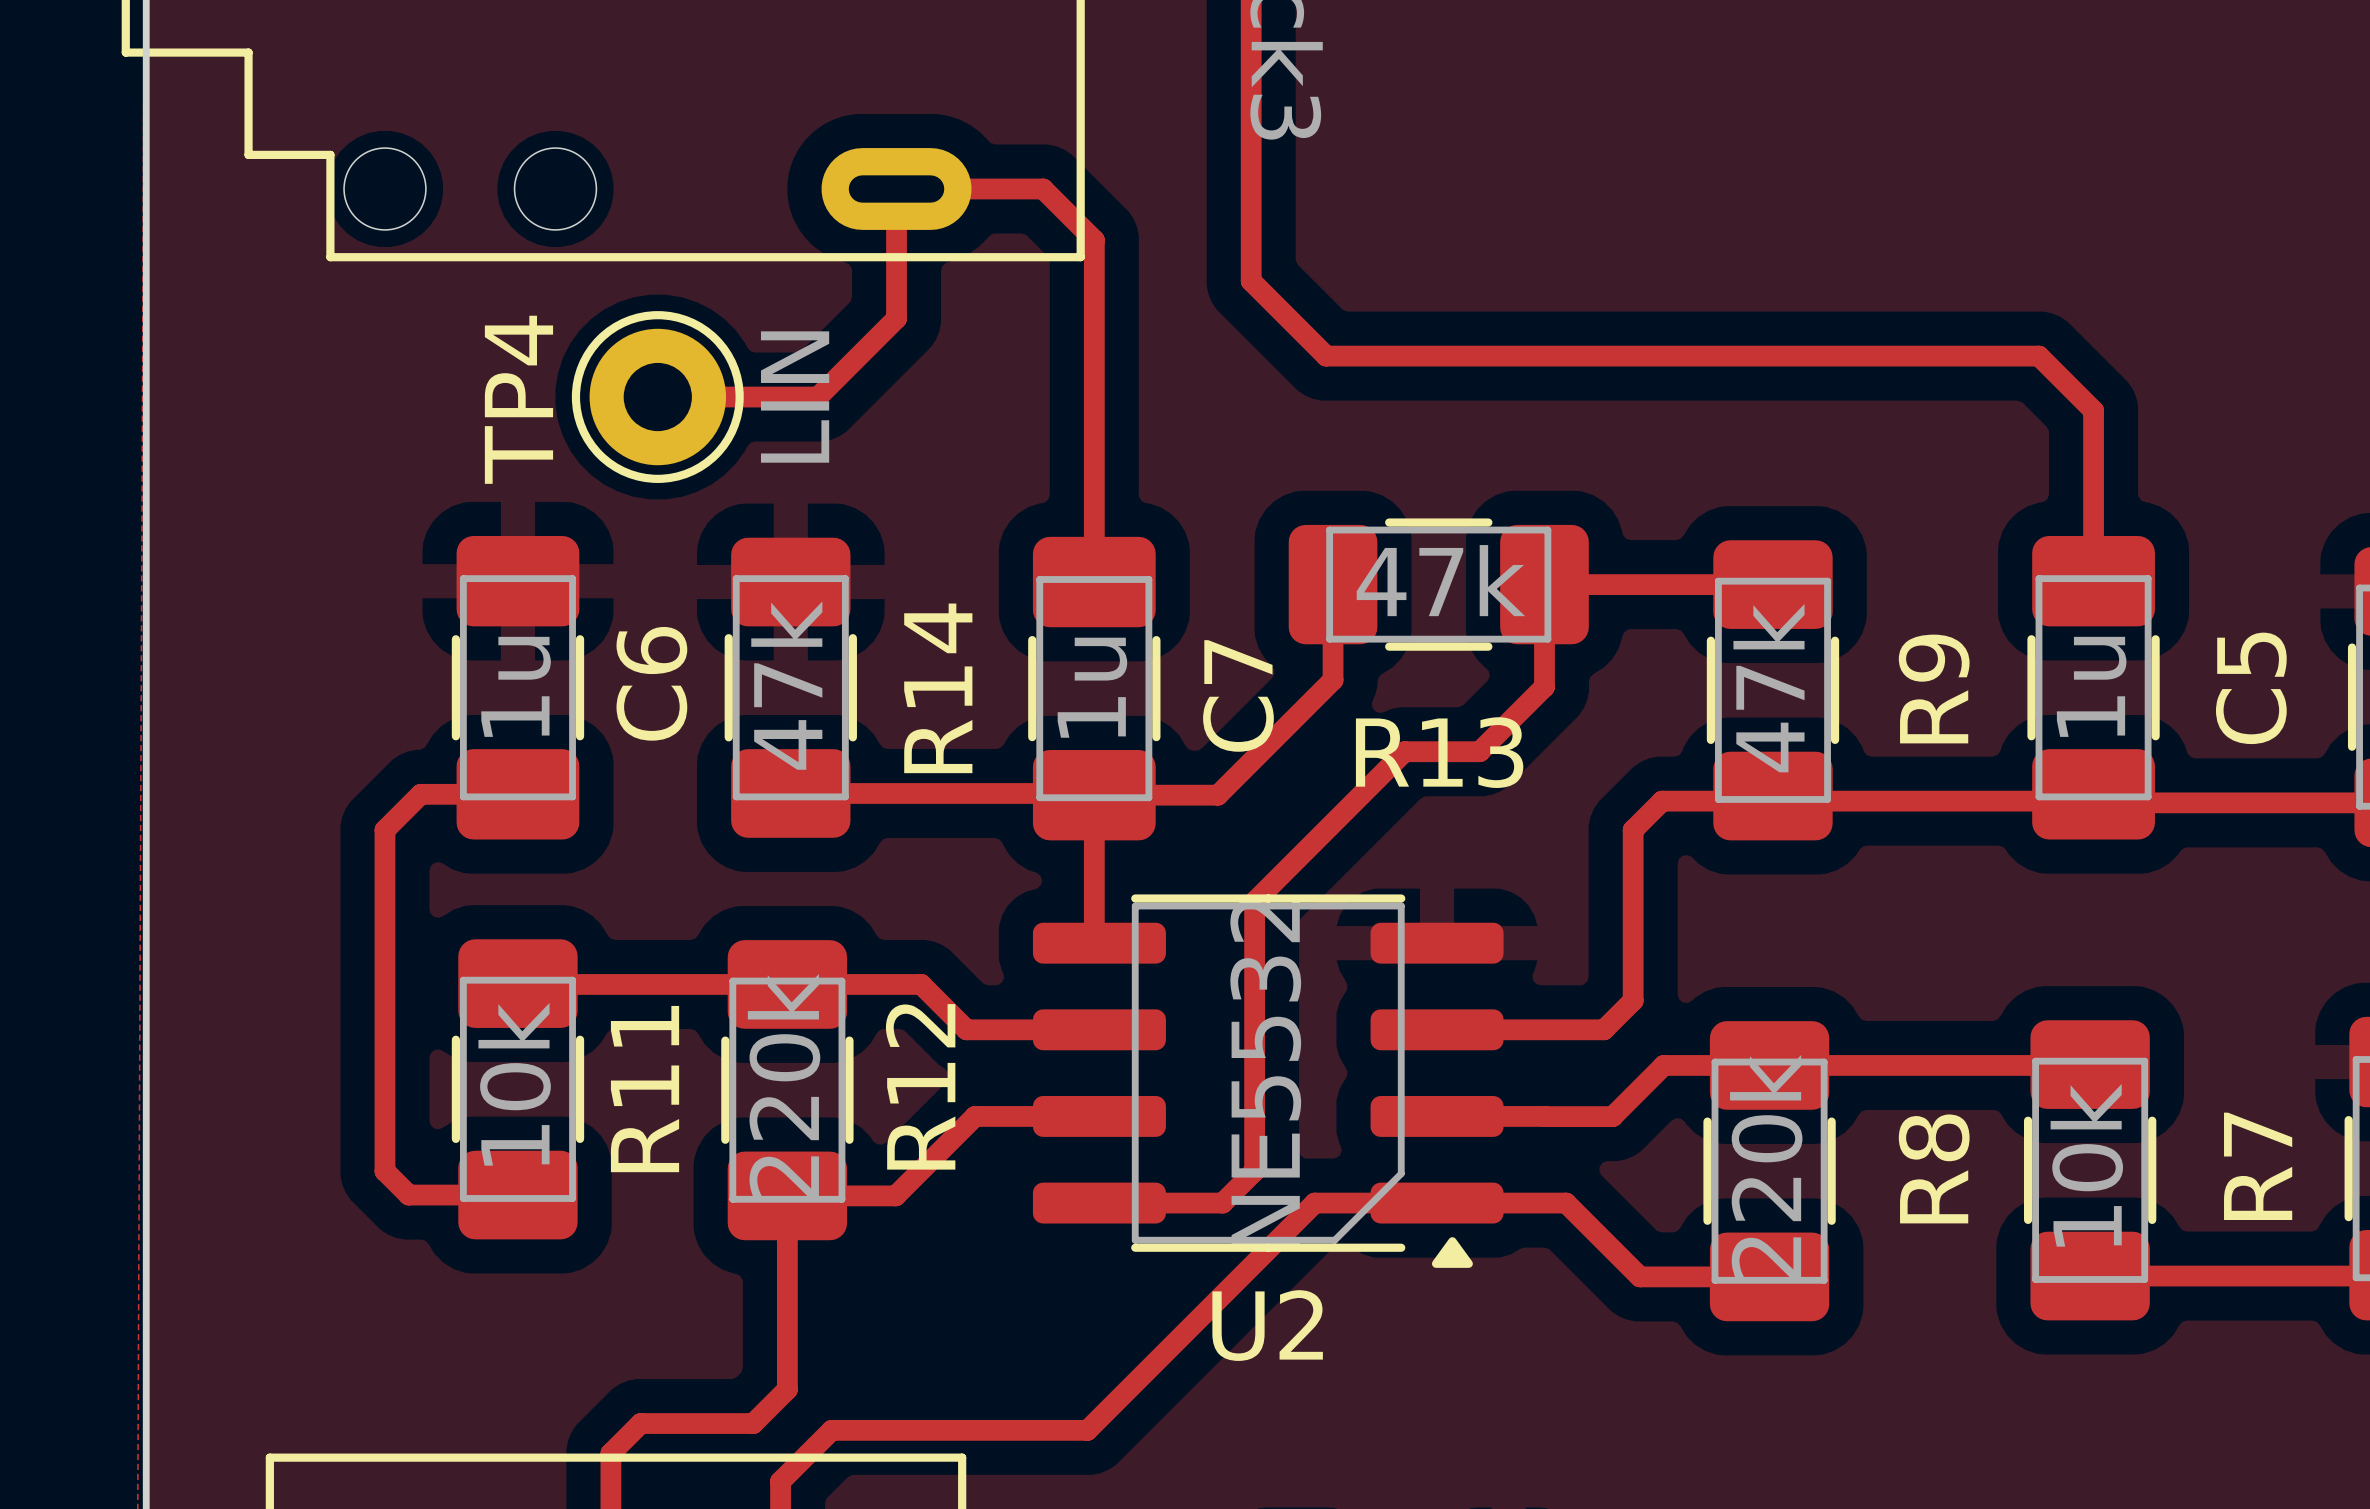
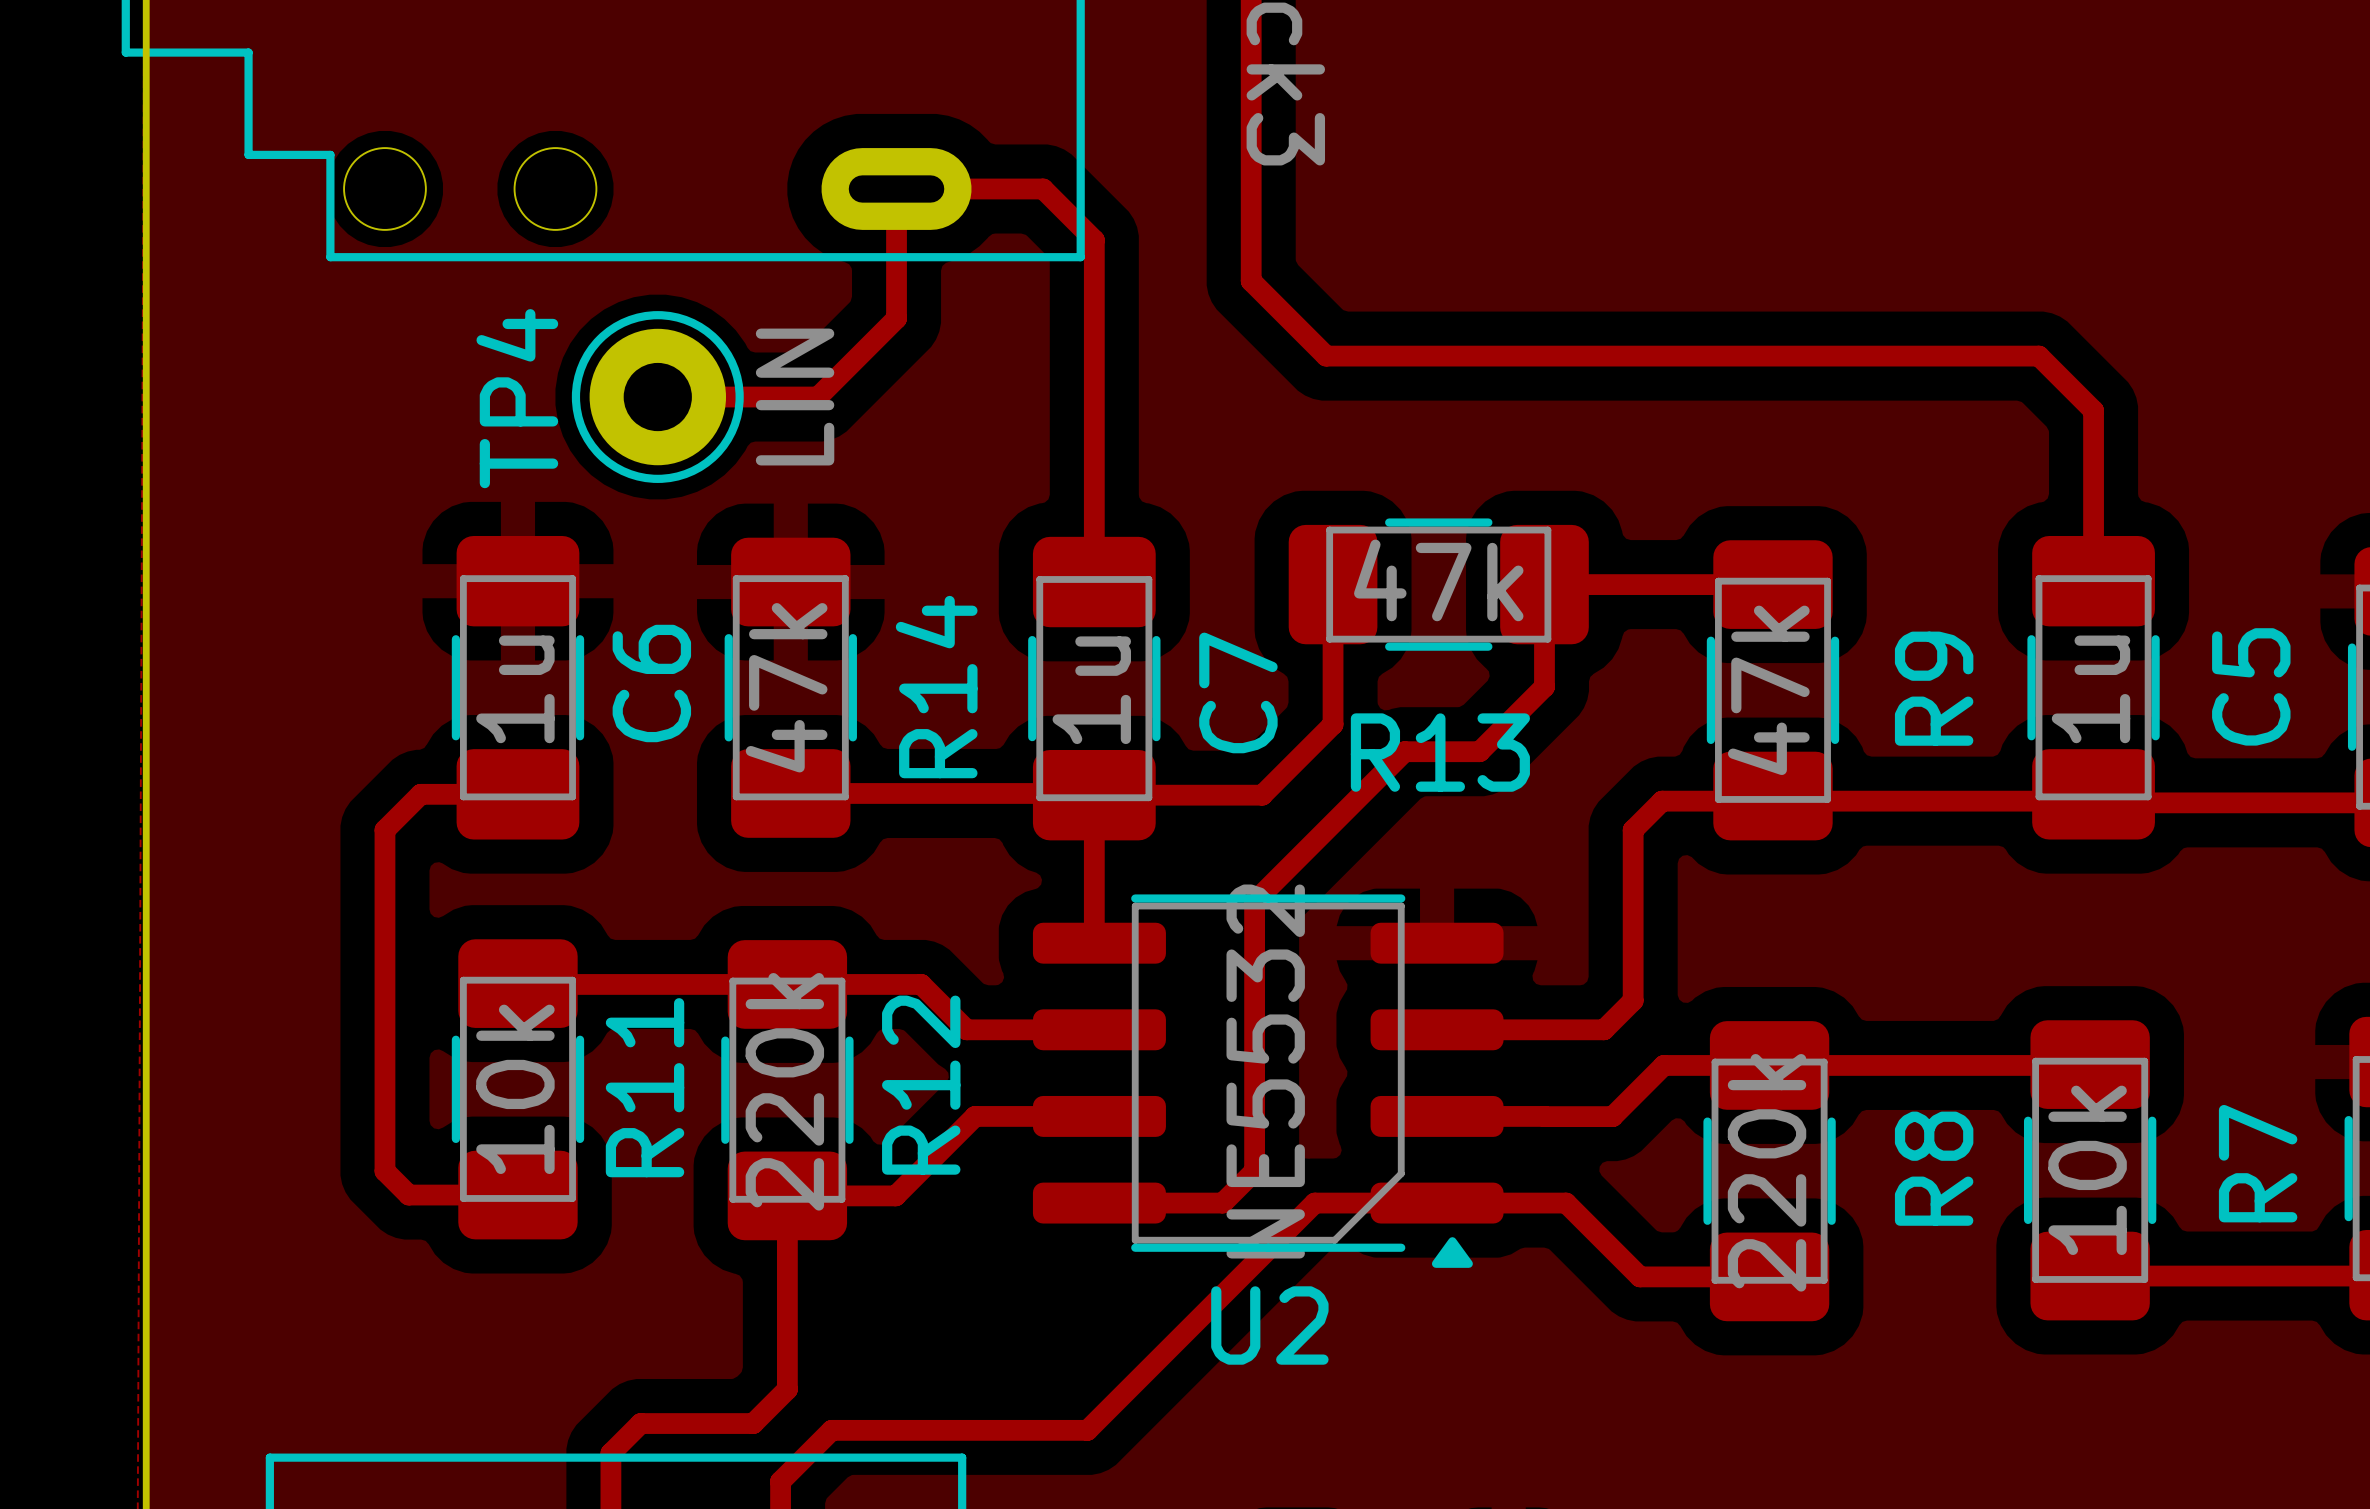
track: (1333, 680) (1217, 795) -> (1333, 680) (1333, 724) (1262, 795) (1217, 795)

